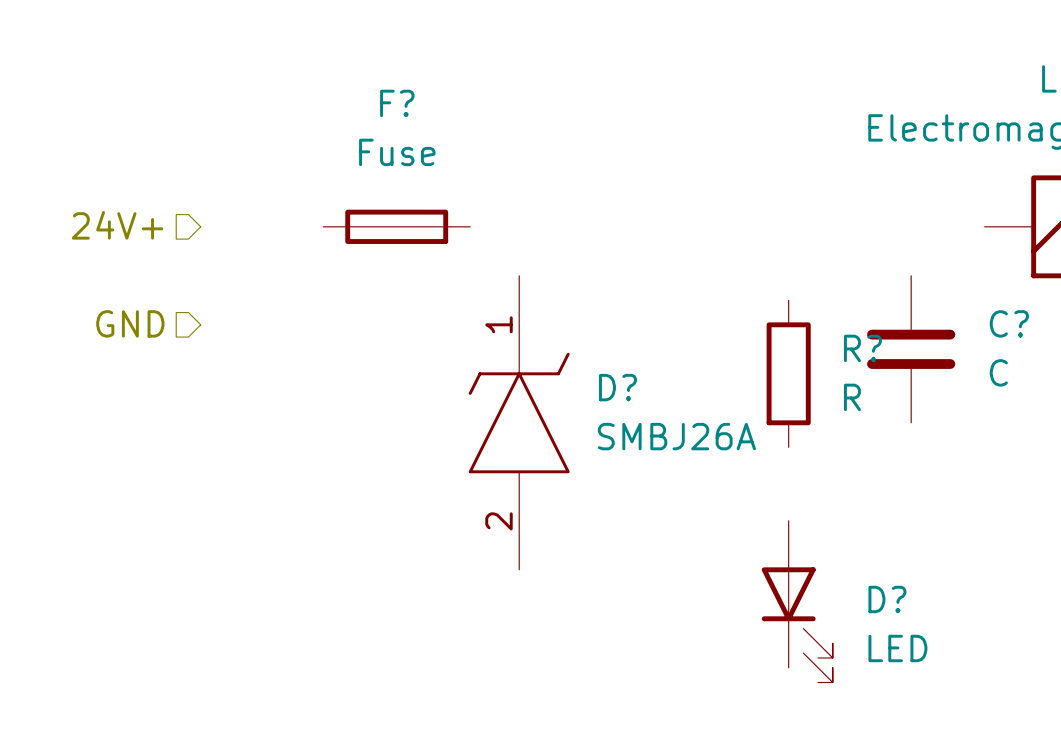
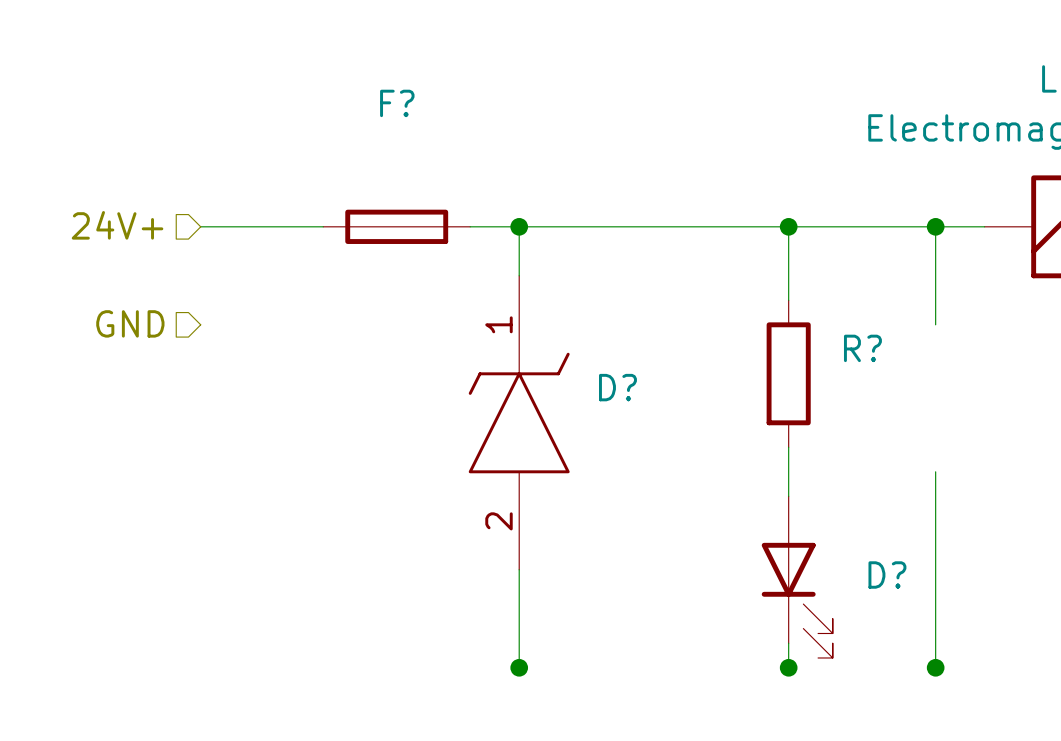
F? value: Fuse (397, 152) -> none
wire: none -> (200, 226) (323, 226)
wire: none -> (470, 226) (984, 226)
wire: none -> (519, 226) (519, 275)
junction: none -> (519, 226)
wire: none -> (788, 226) (788, 300)
junction: none -> (788, 226)
wire: none -> (935, 226) (935, 324)
junction: none -> (935, 226)
C?: C (911, 349) -> none
R? value: R (852, 397) -> none
D? value: SMBJ26A (676, 436) -> none
wire: none -> (788, 447) (788, 496)
wire: none -> (935, 471) (935, 667)
wire: none -> (519, 569) (519, 667)
D?: none -> (797, 577)
D?: LED (797, 601) -> none
junction: none -> (519, 667)
junction: none -> (788, 667)
junction: none -> (935, 667)

